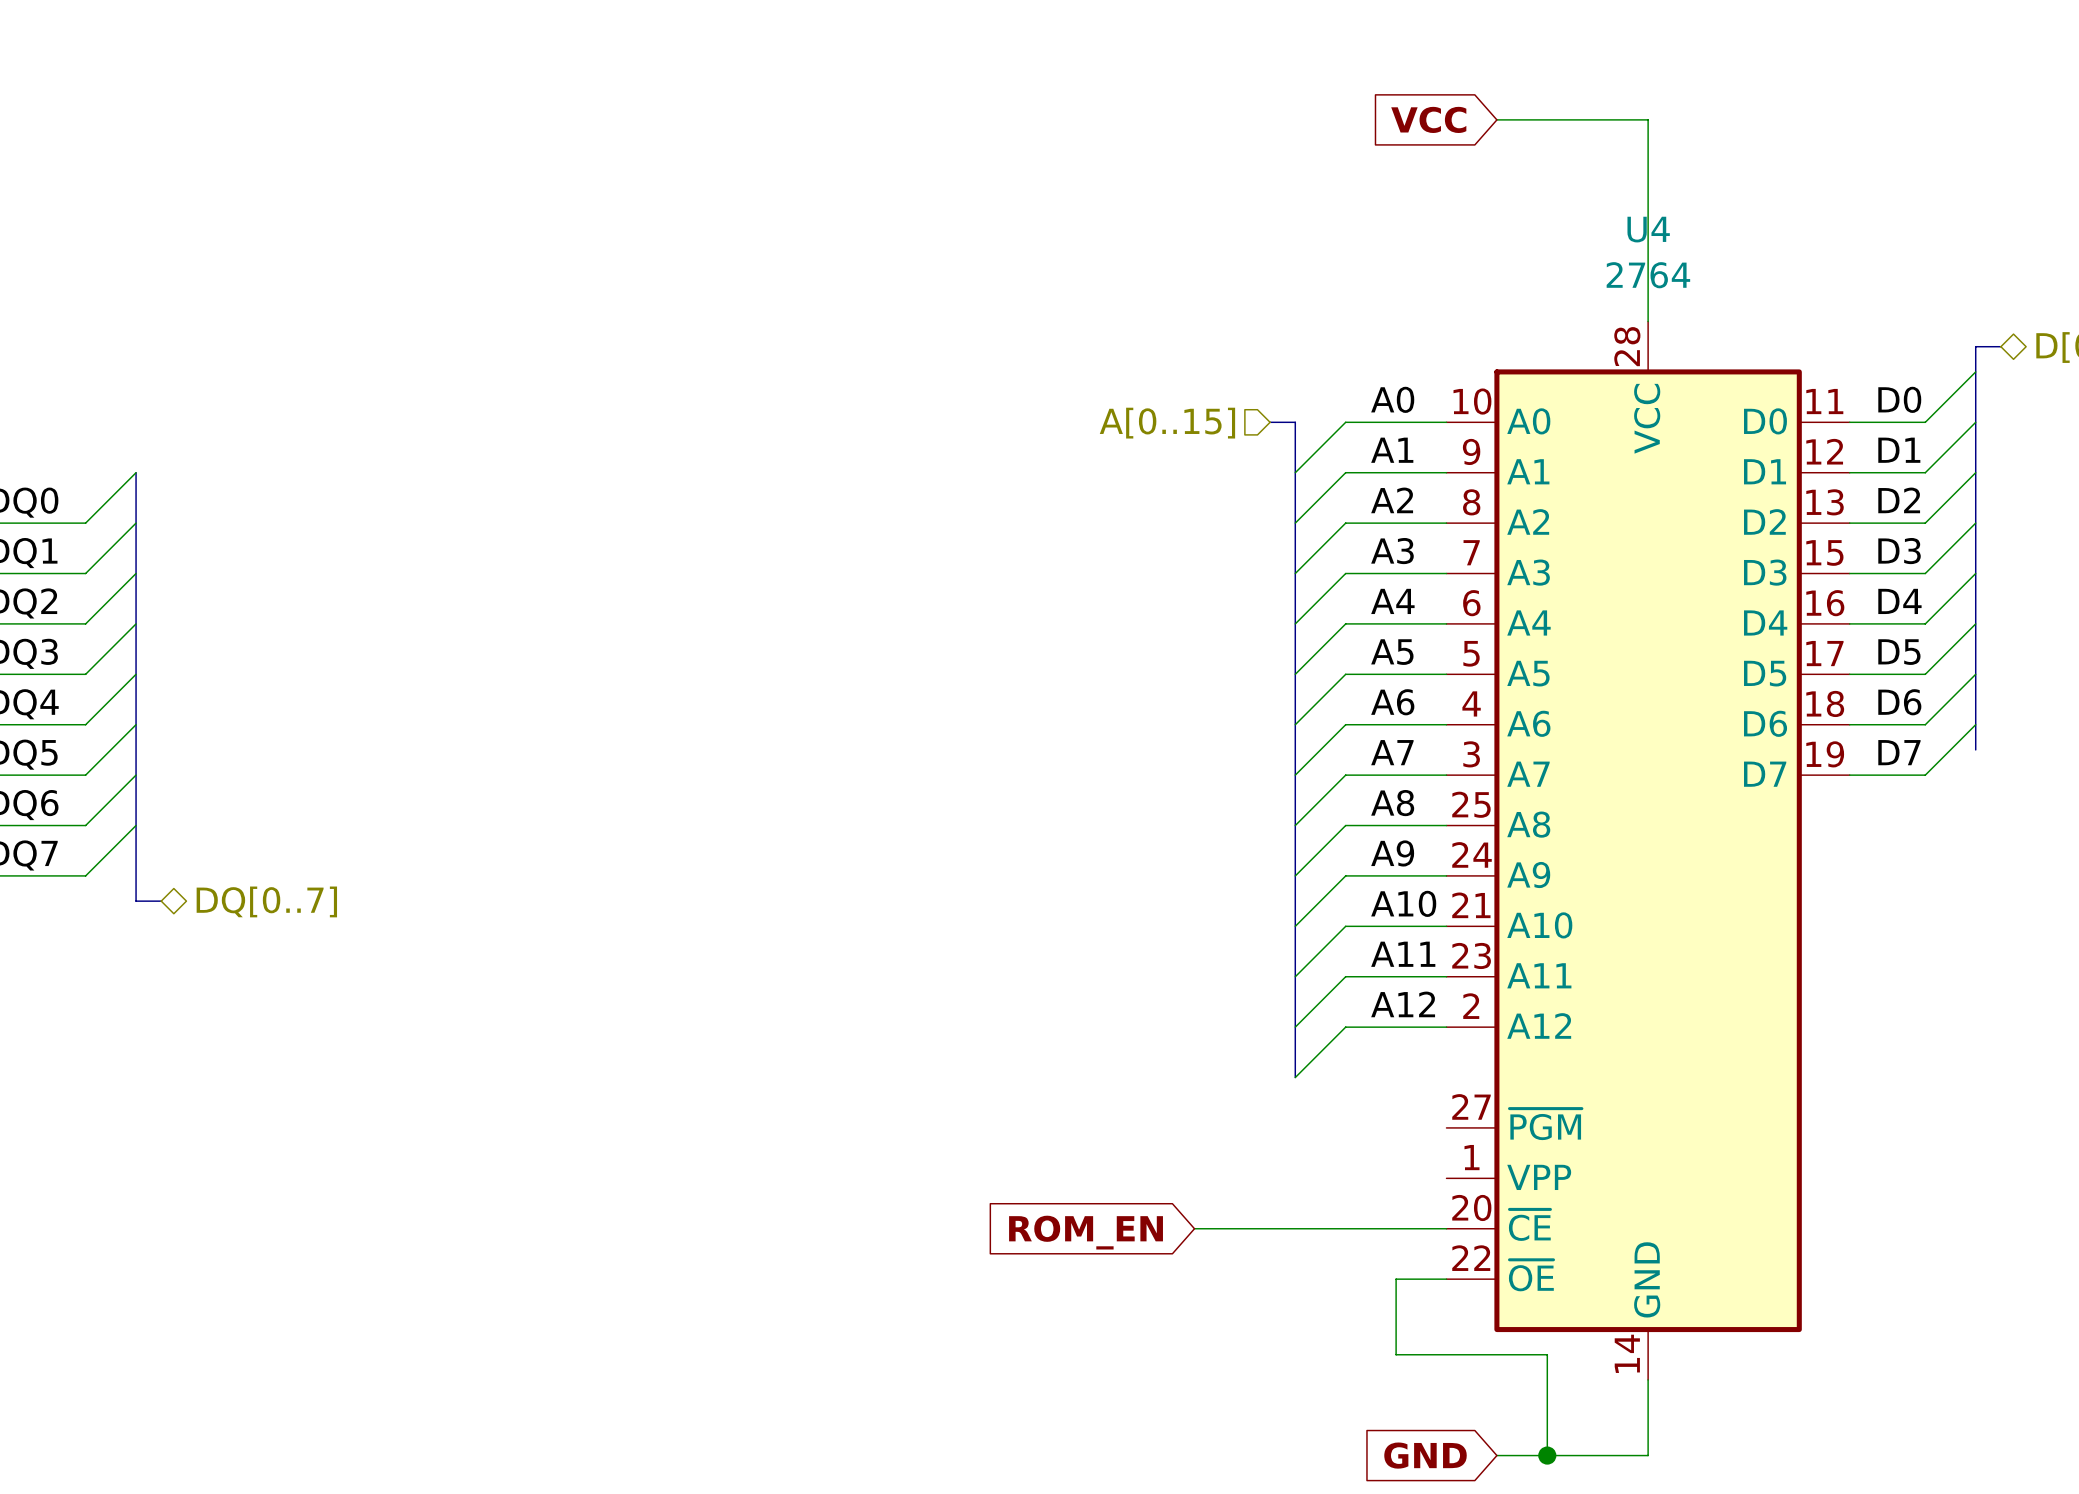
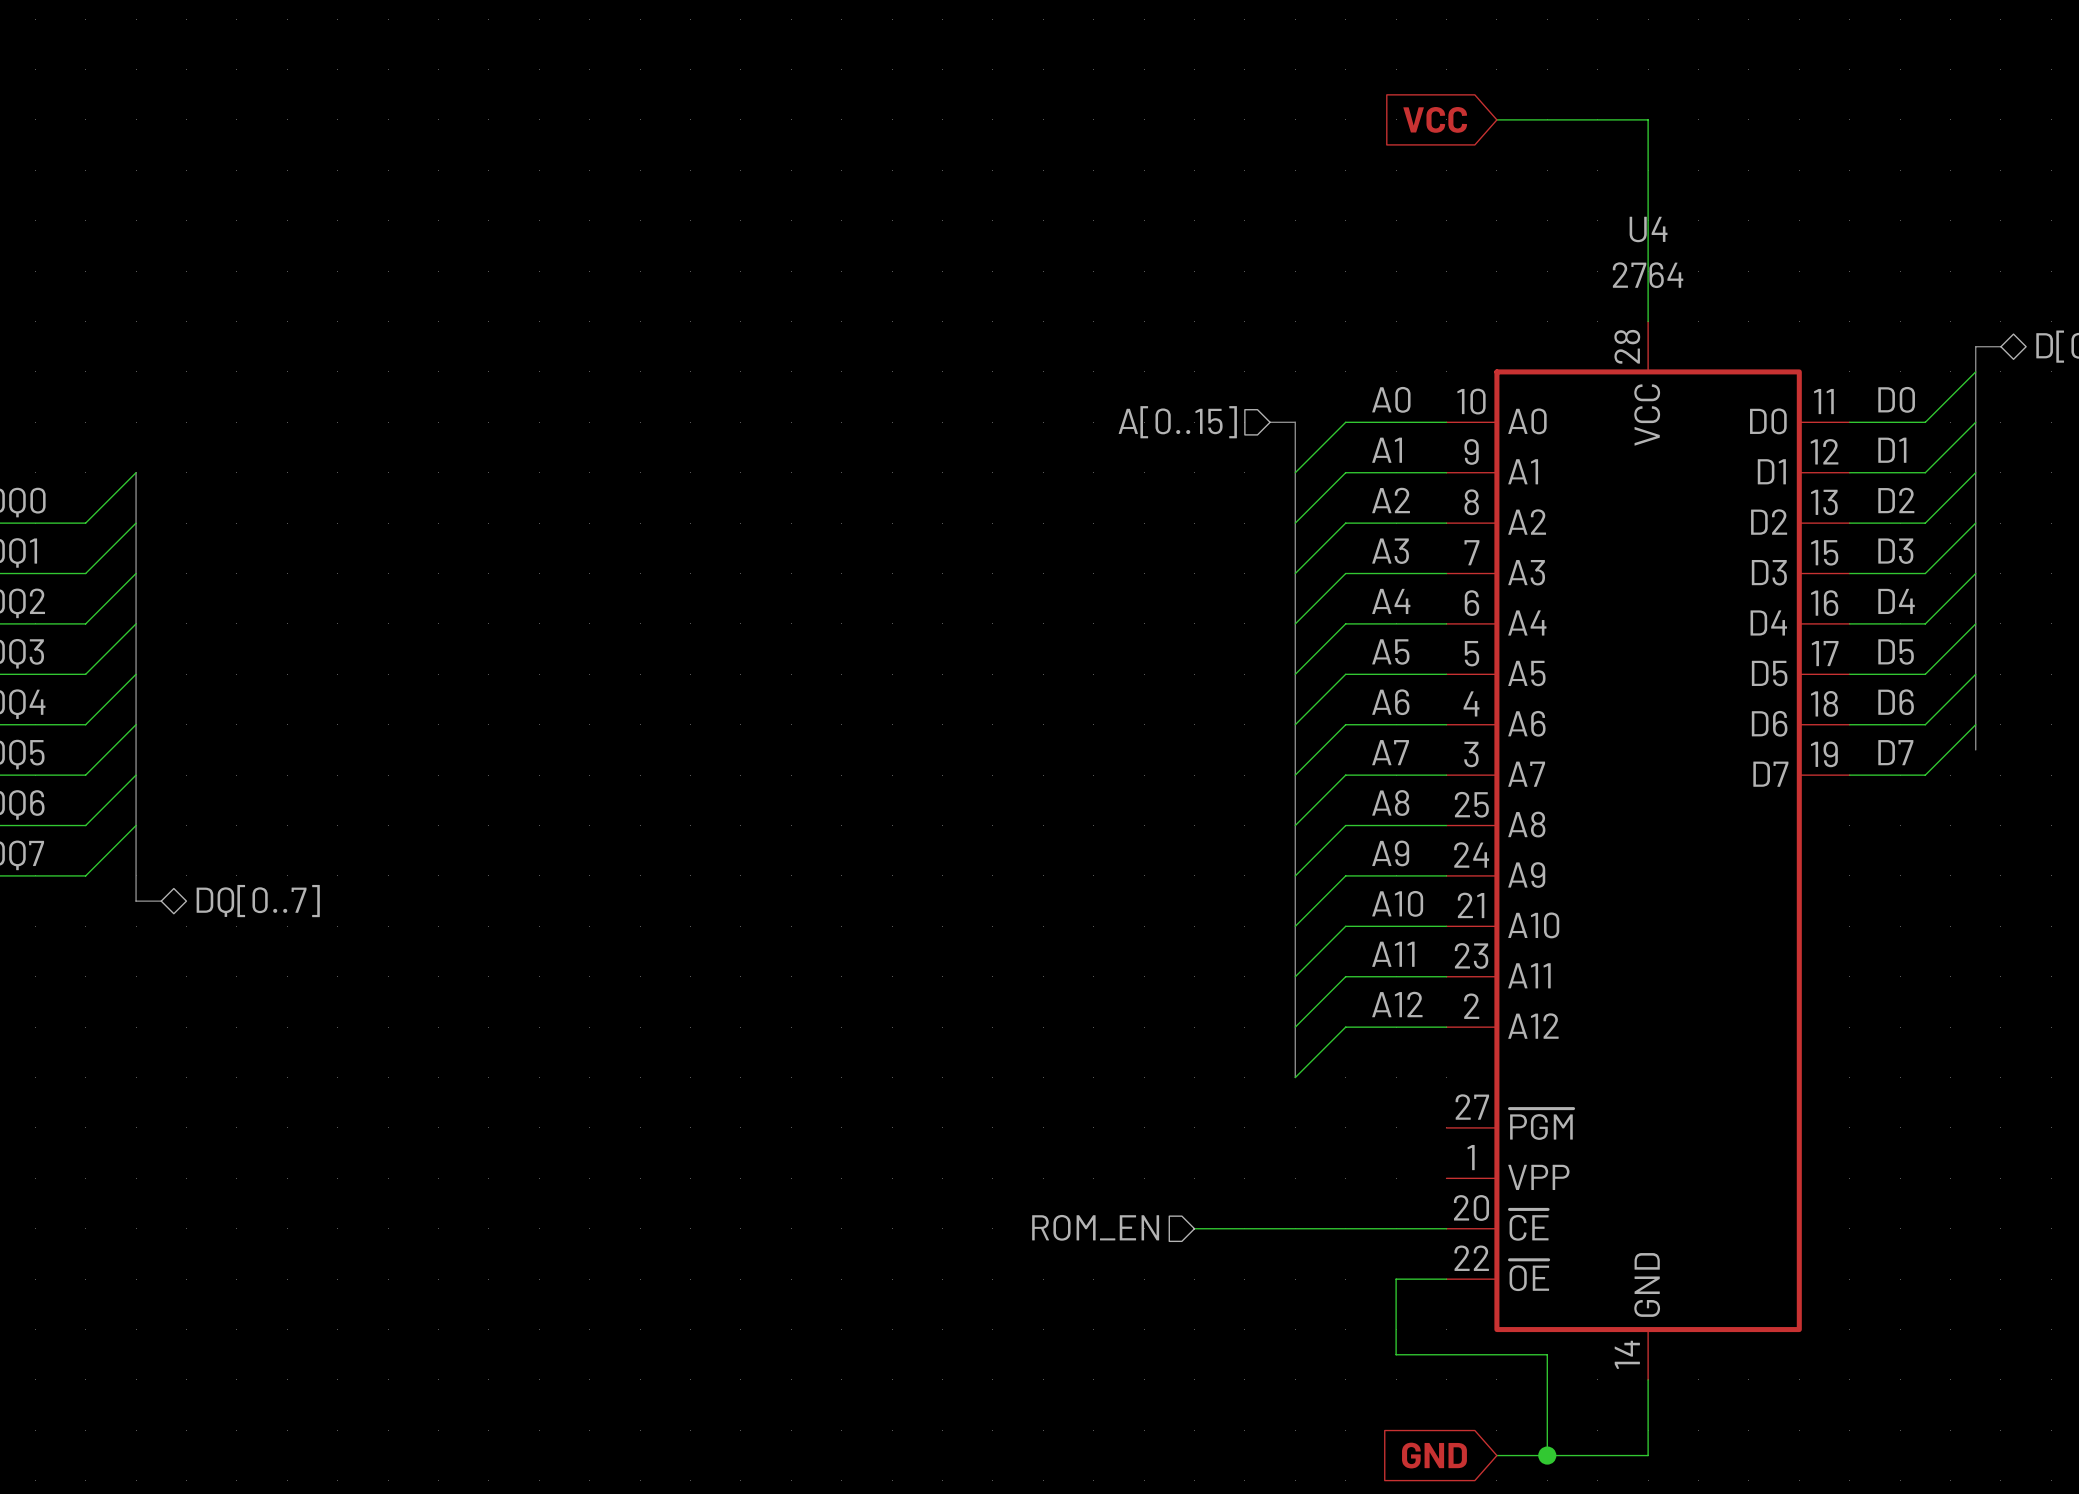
hierarchical label: none -> ROM_EN (1095, 1227)
global label: ROM_EN (1086, 1232) -> none

